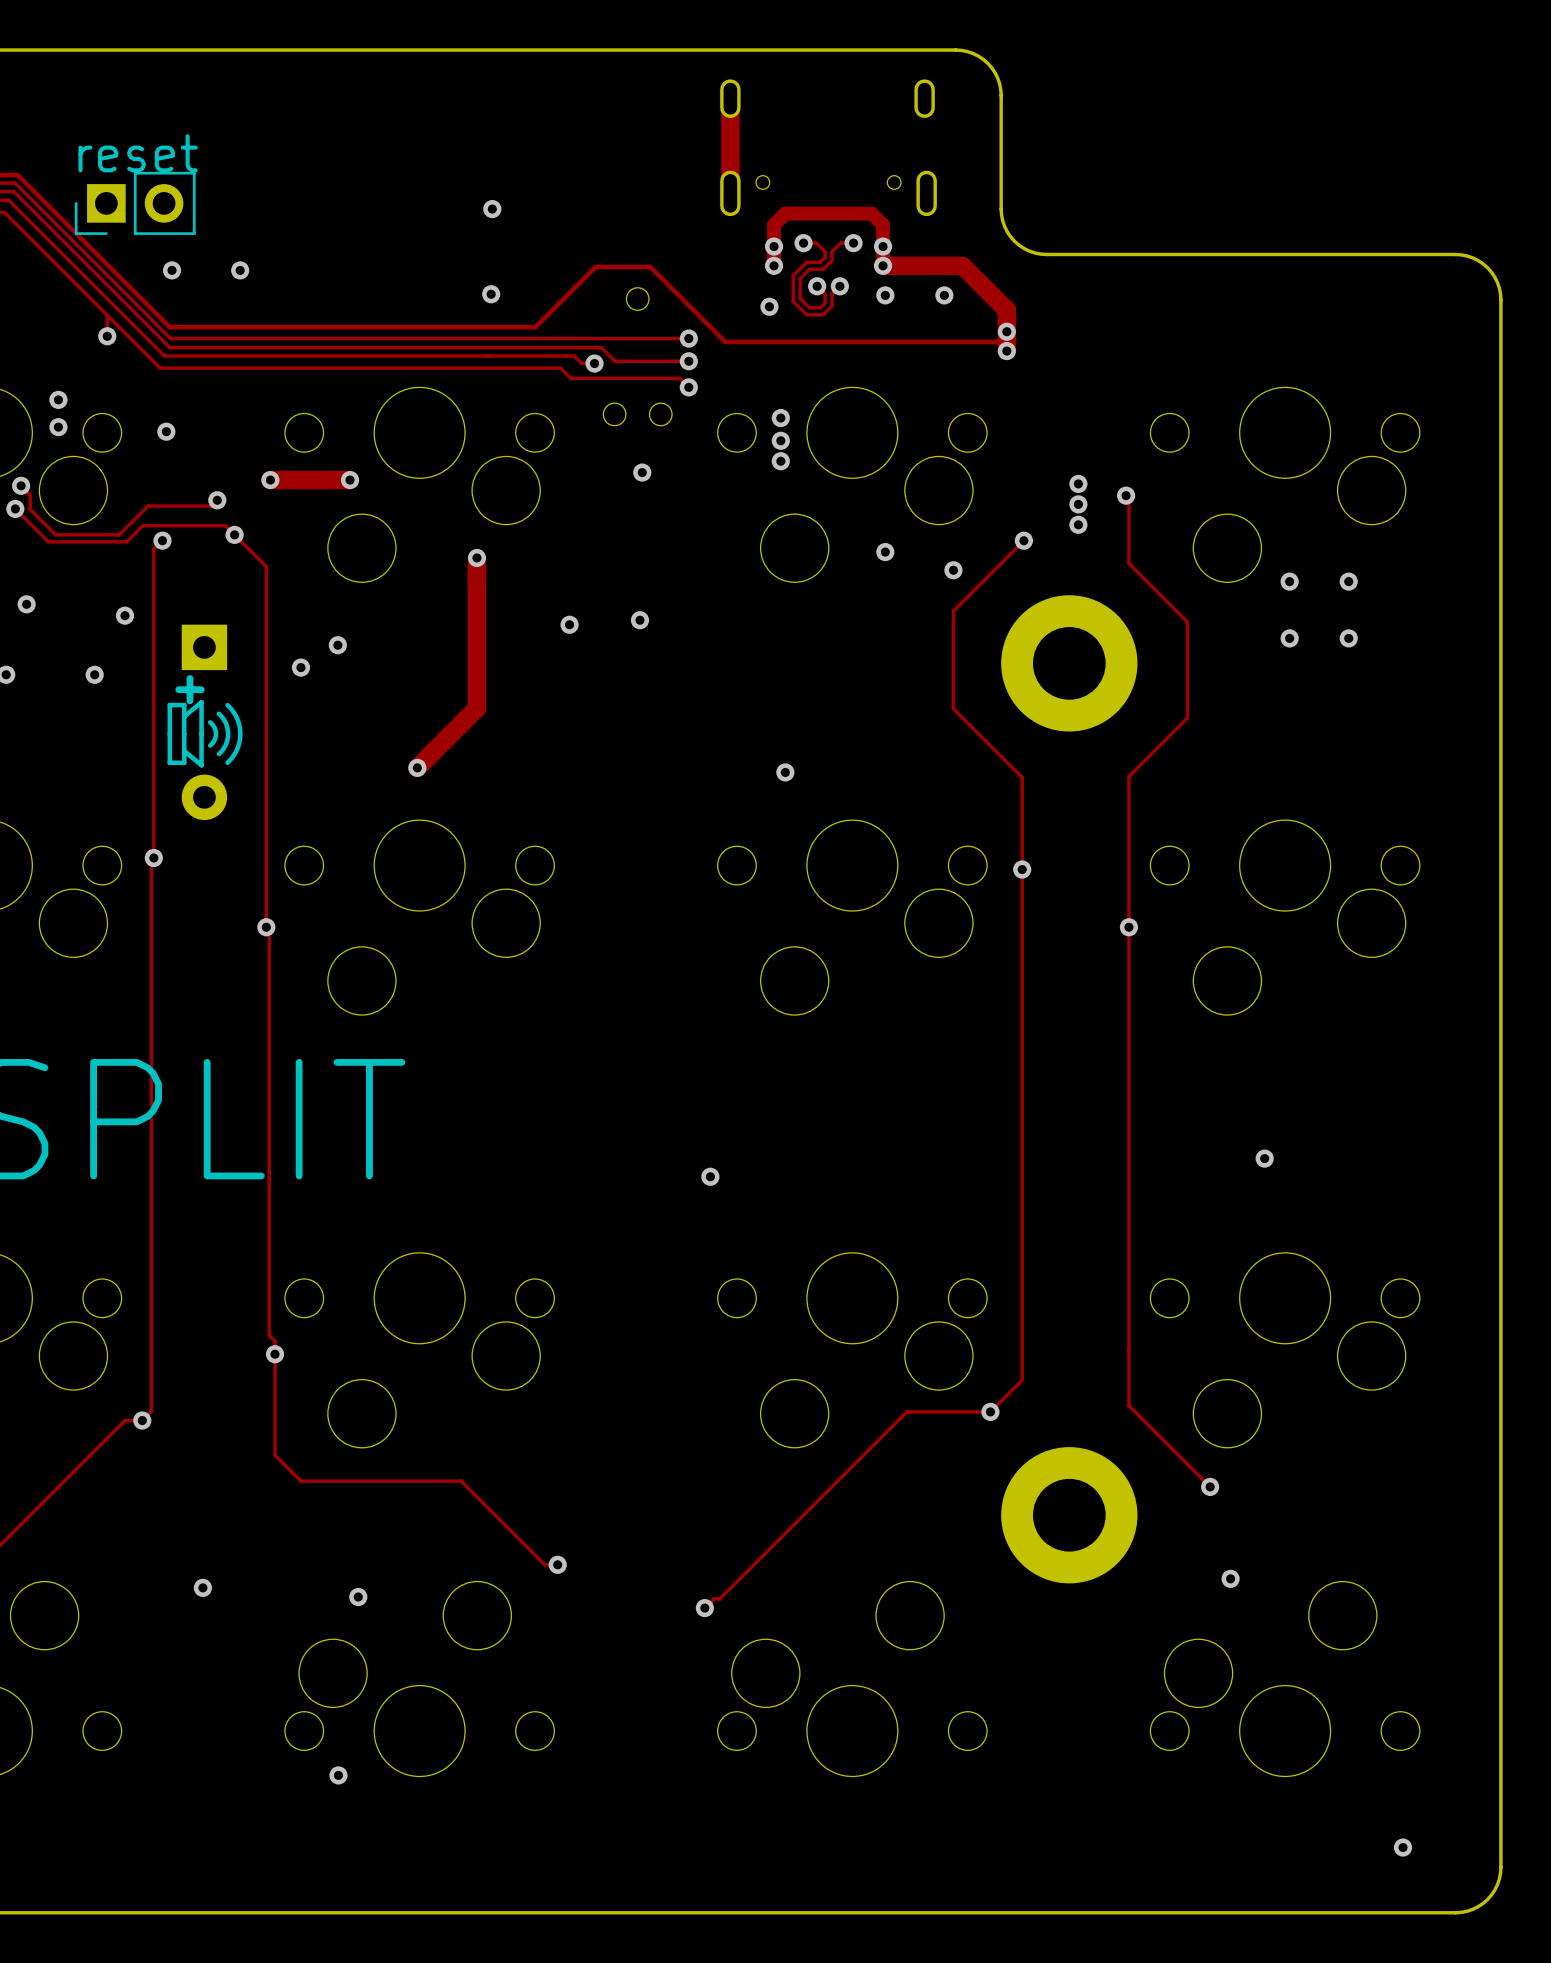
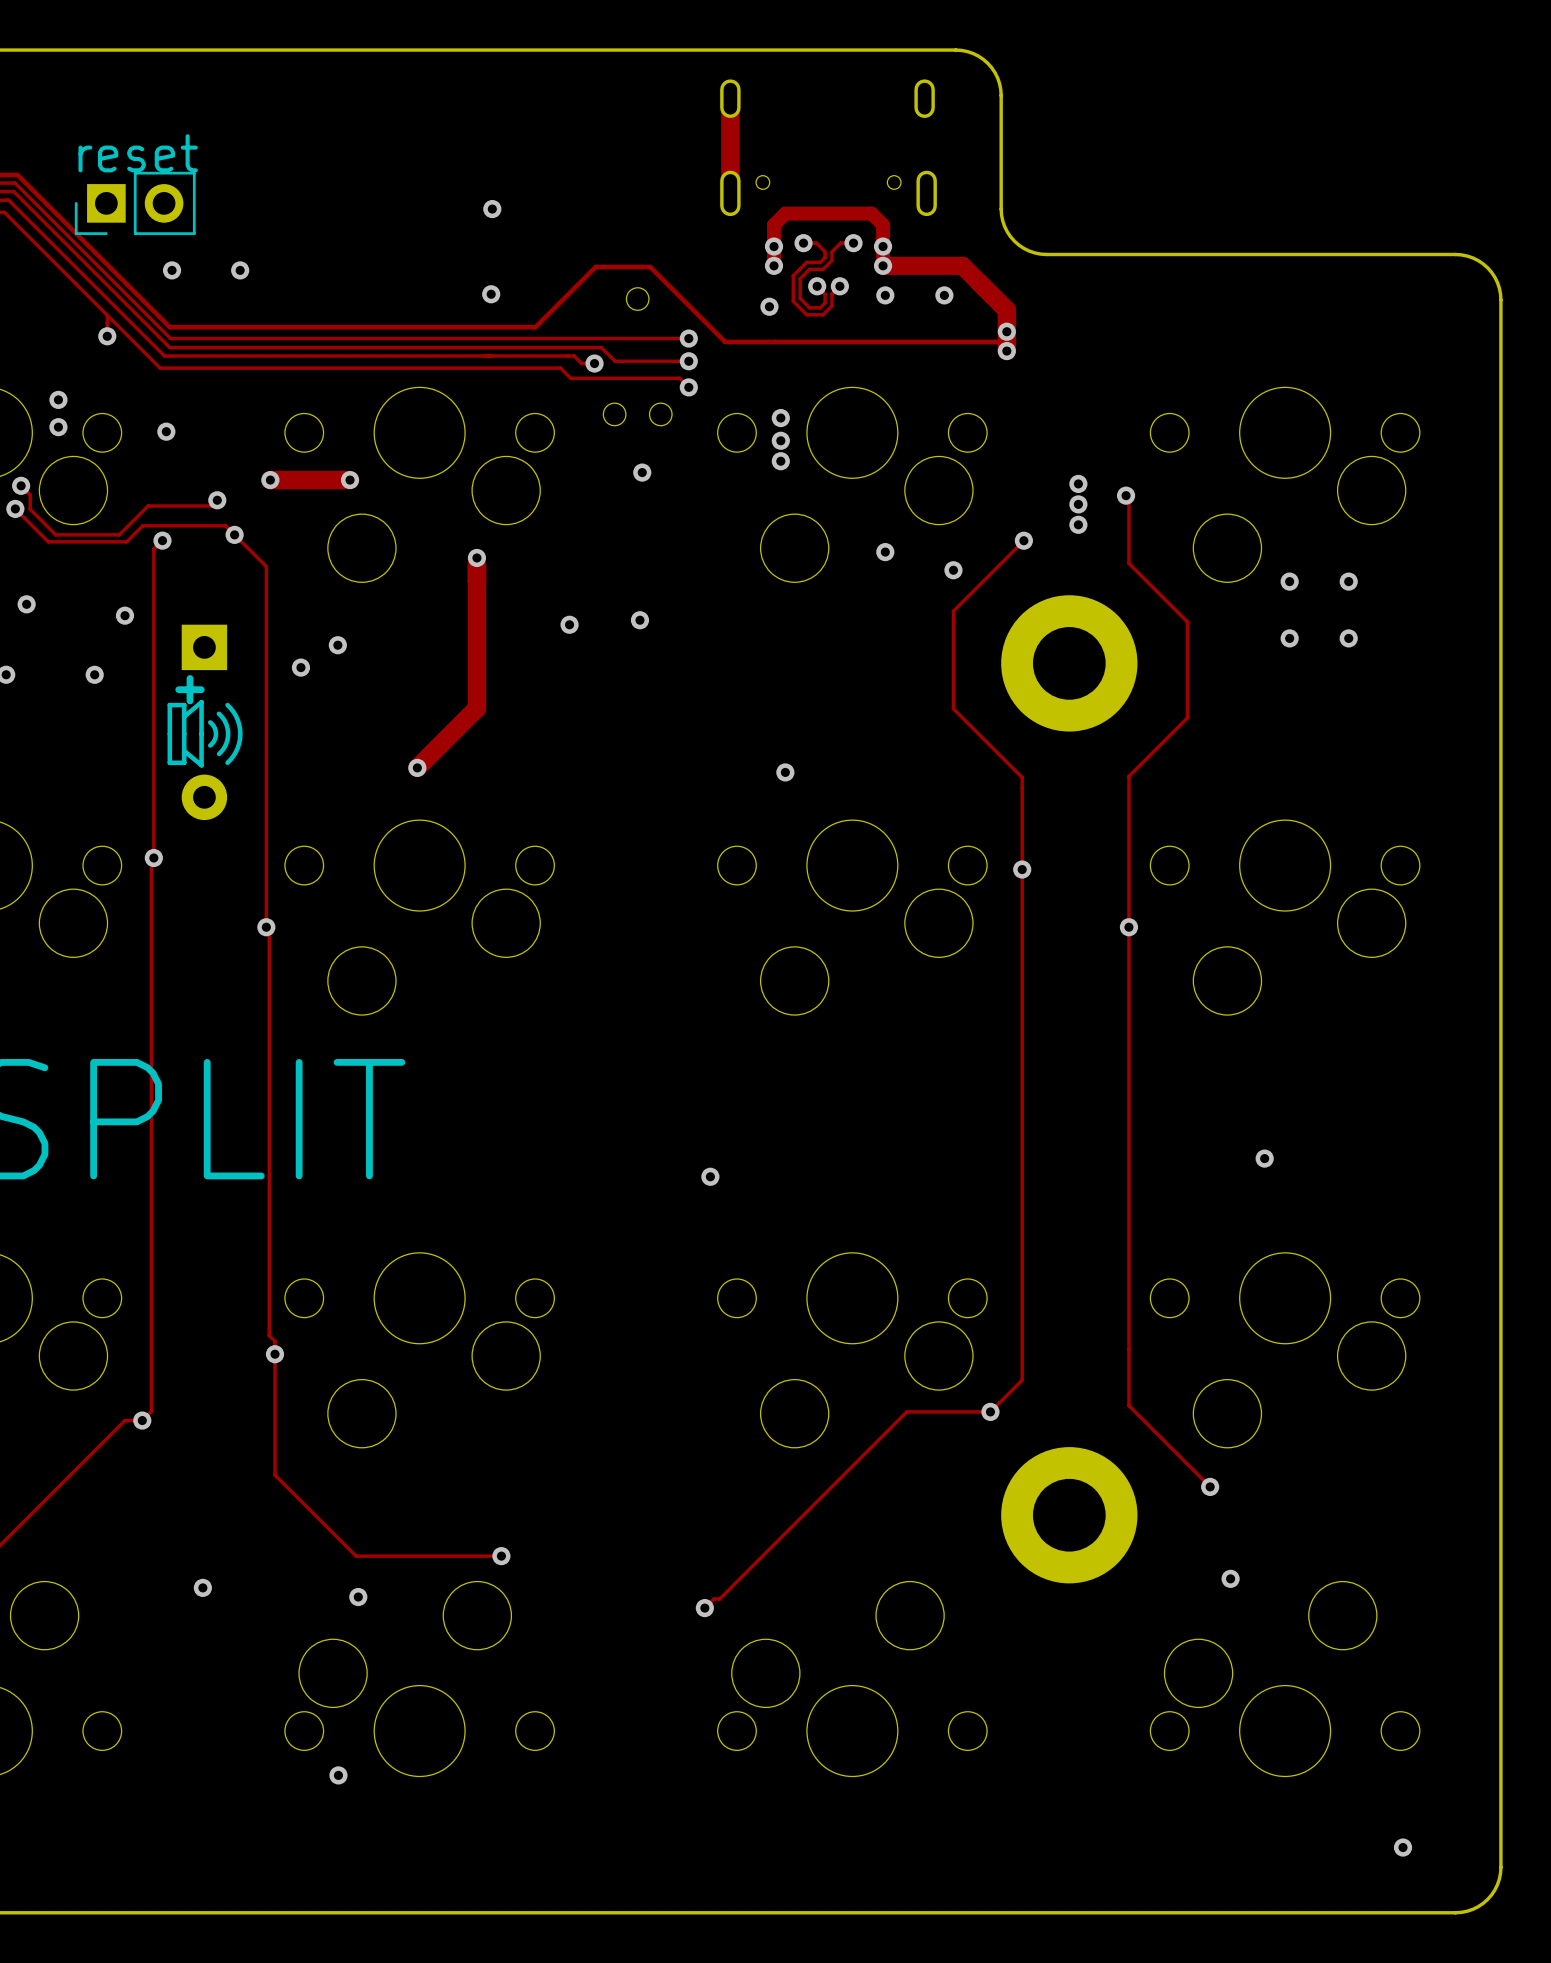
track: (275, 1455) (300, 1481) (461, 1481) (544, 1564) (557, 1564) -> (275, 1455) (275, 1475) (356, 1556) (501, 1556)
via position: (557, 1564) -> (501, 1556)

